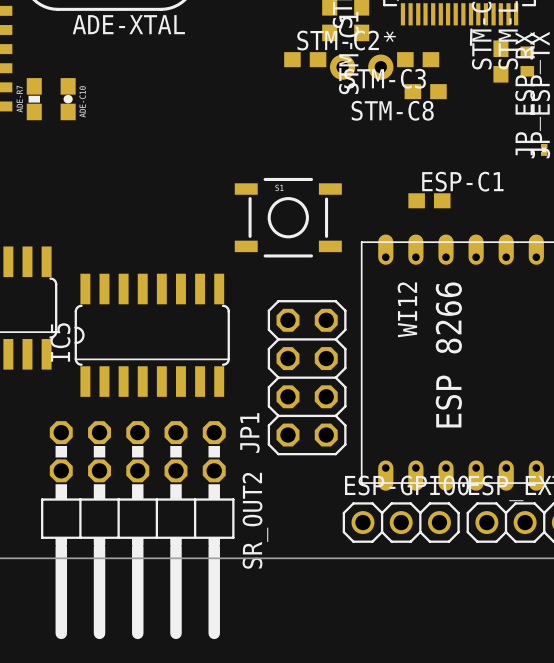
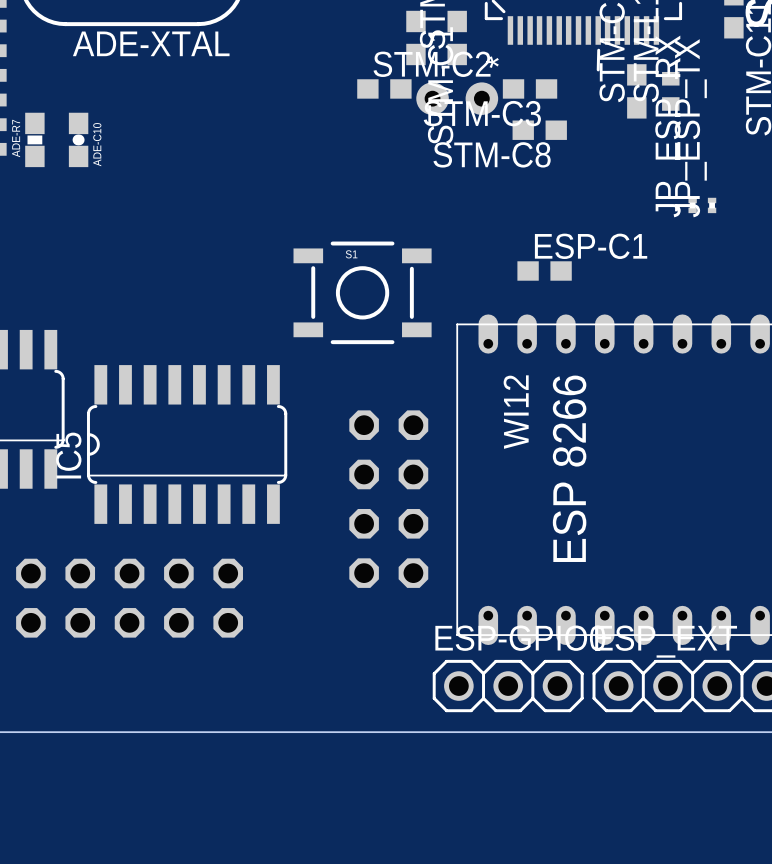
JP1 side: top (307, 377) -> bottom (388, 499)
SR_OUT2 side: top (137, 530) -> bottom (129, 598)

